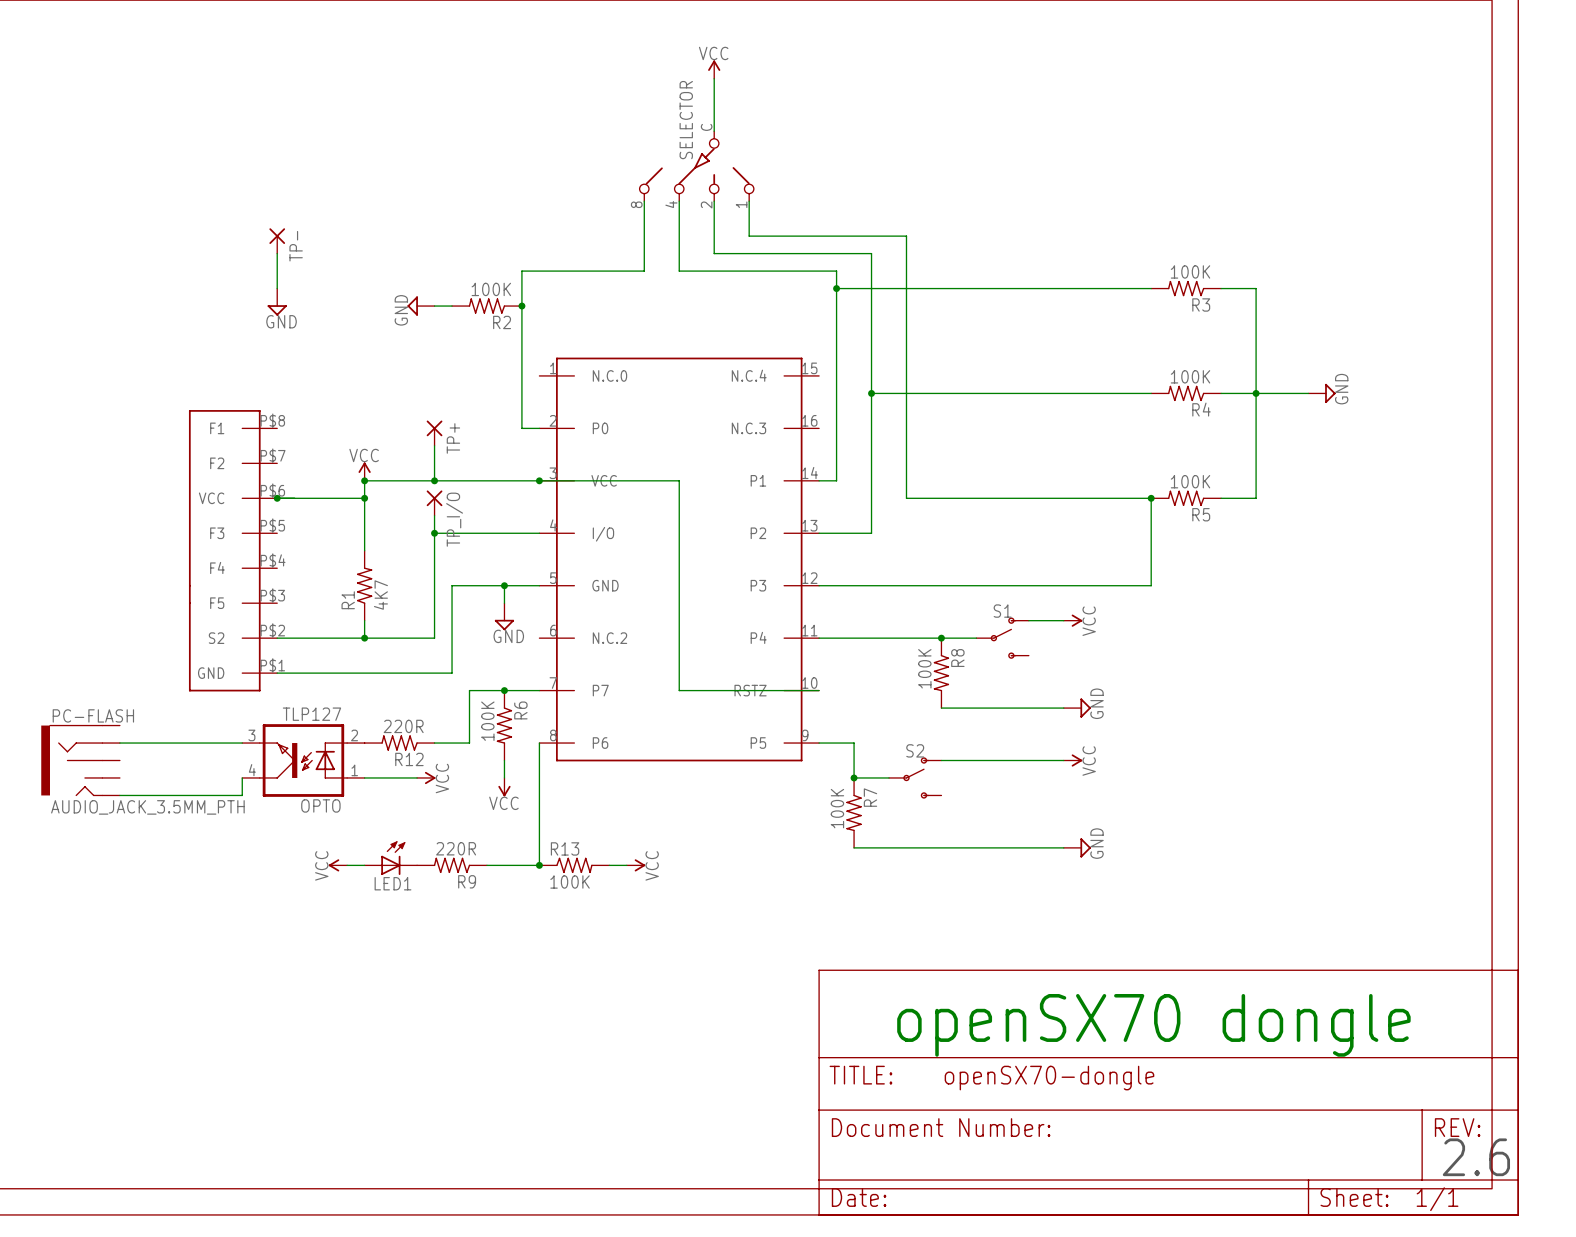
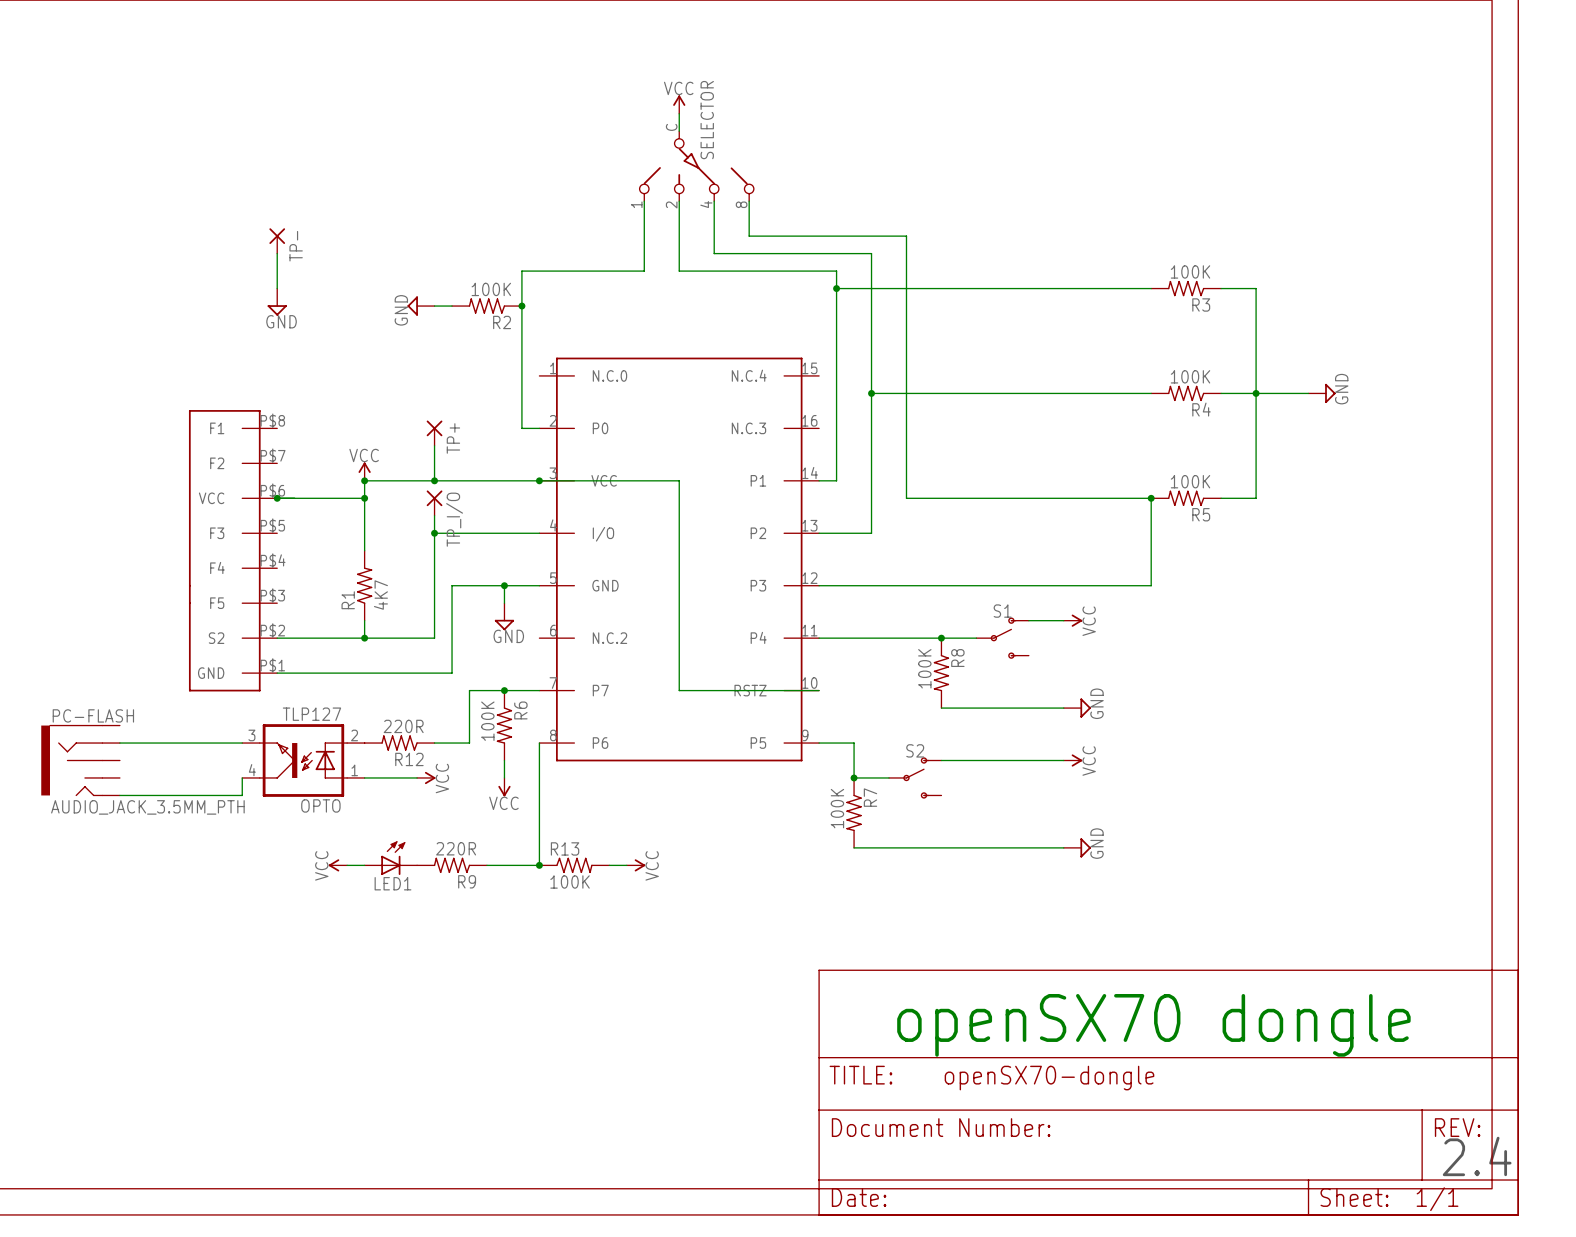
power symbol position: VCC (714, 69) -> VCC (679, 104)
wire: (714, 78) (714, 131) -> none
wire: none -> (679, 113) (679, 131)
SELECTOR flip: as is (697, 166) -> left-right (695, 166)
text: 2.6 (1476, 1157) -> 2.4 (1477, 1156)

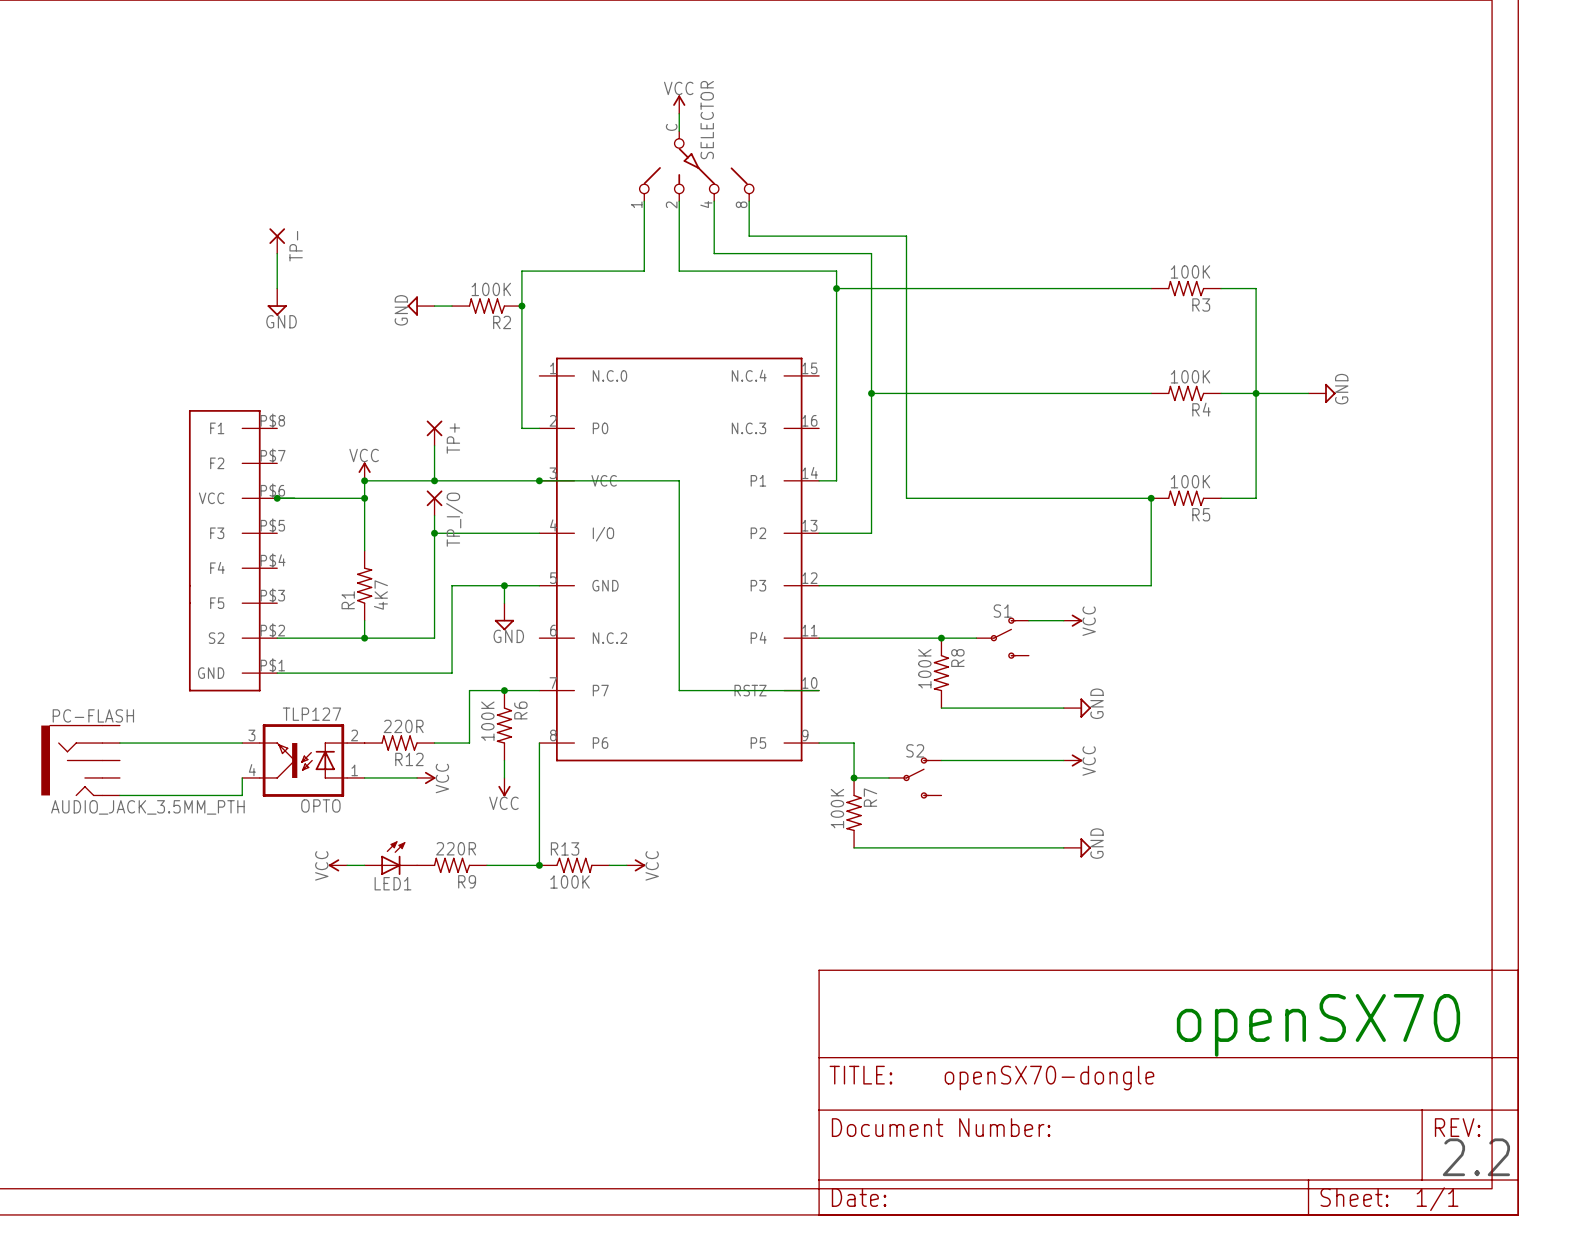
text: openSX70 dongle (1153, 1025) -> none
text: none -> openSX70 (1318, 1025)
text: 2.4 (1477, 1156) -> 2.2 (1476, 1157)

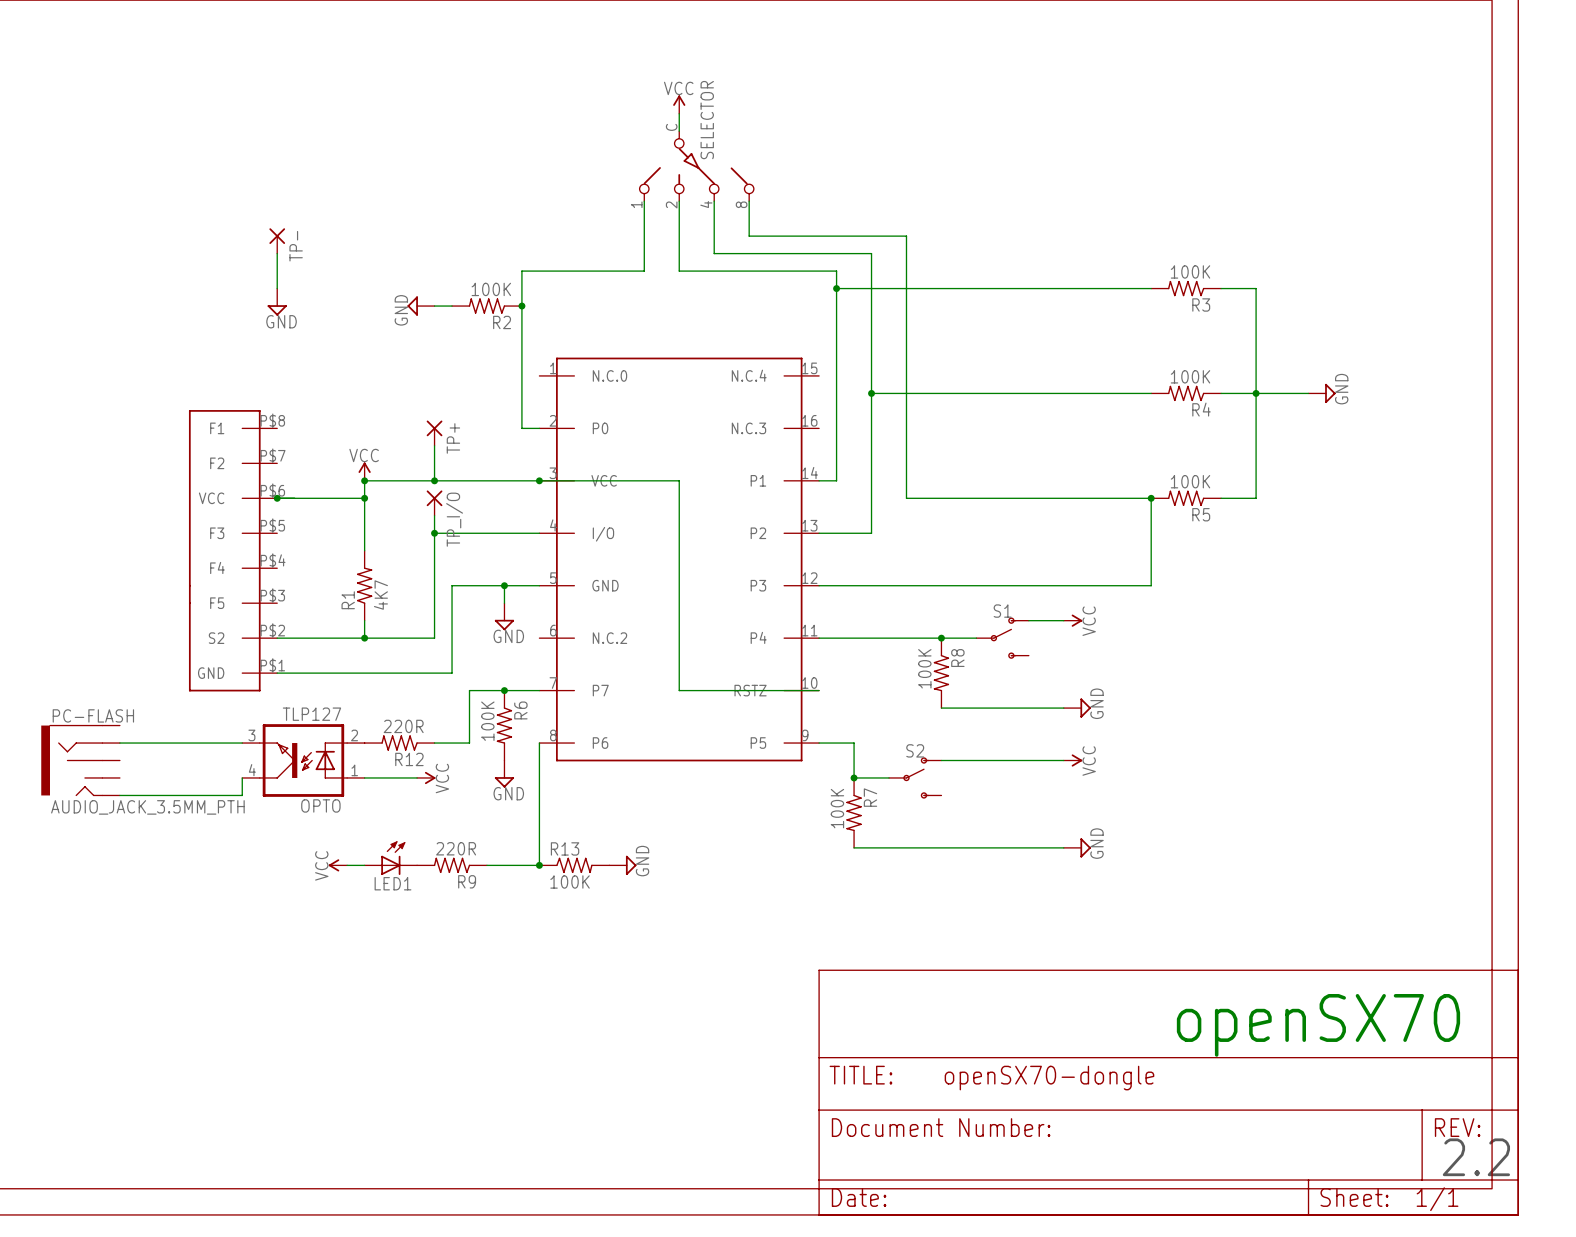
power symbol: none -> GND (504, 774)
power symbol: VCC (504, 787) -> none
power symbol: none -> GND (622, 865)
power symbol: VCC (635, 865) -> none

